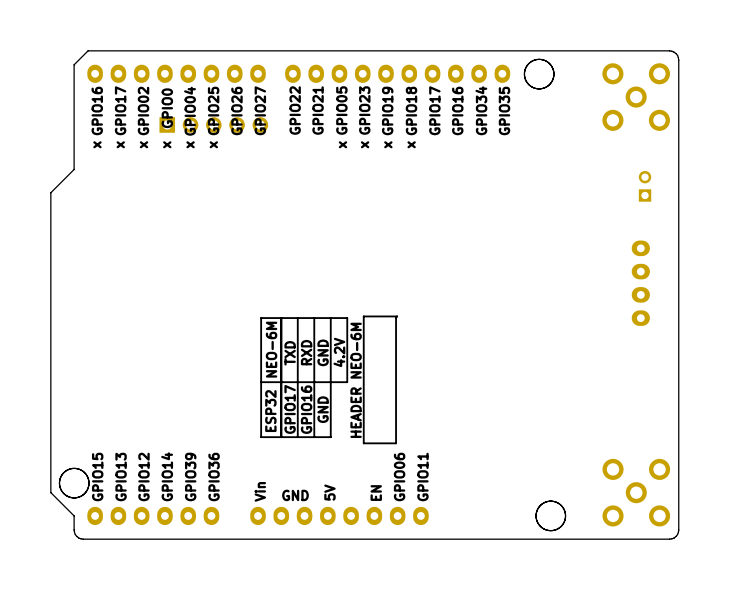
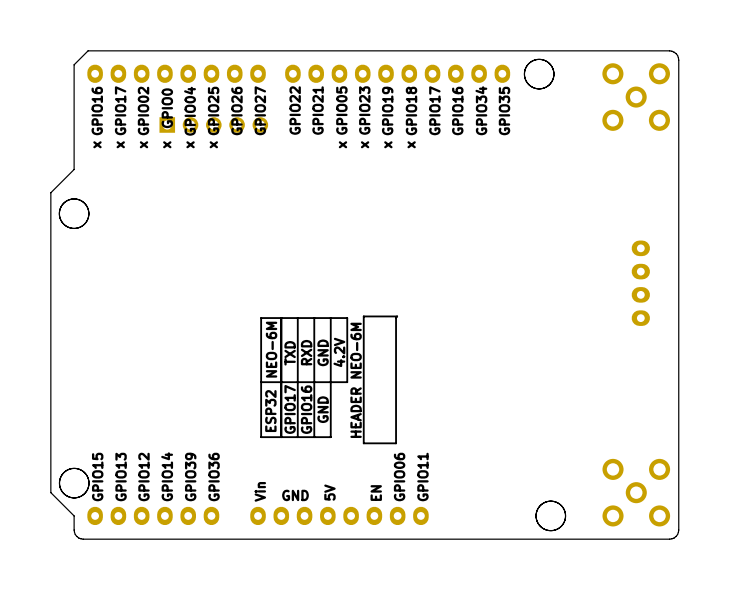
part: (645, 186) -> none
board edge: none -> (74, 198) (64, 202) (59, 212) (63, 223) (73, 228) (83, 225) (88, 214) (85, 204) (74, 198)

